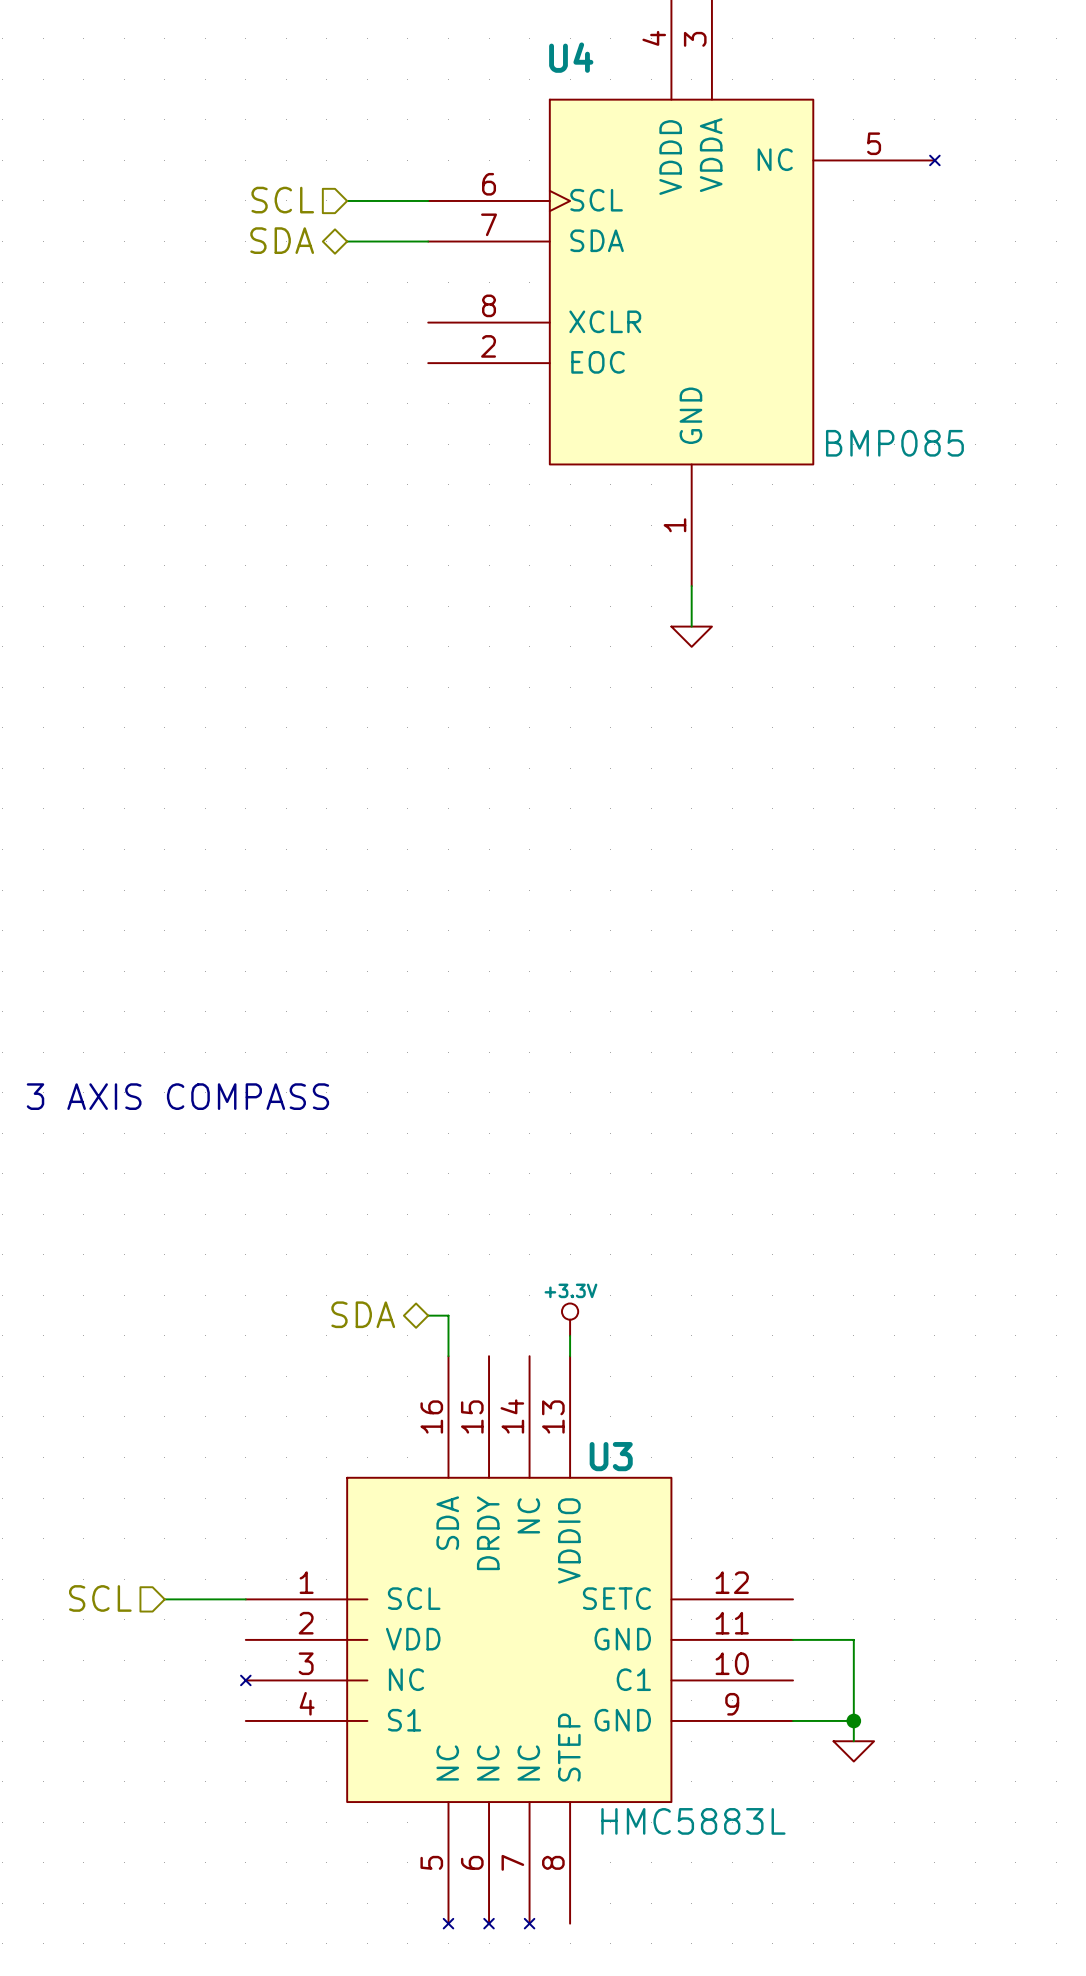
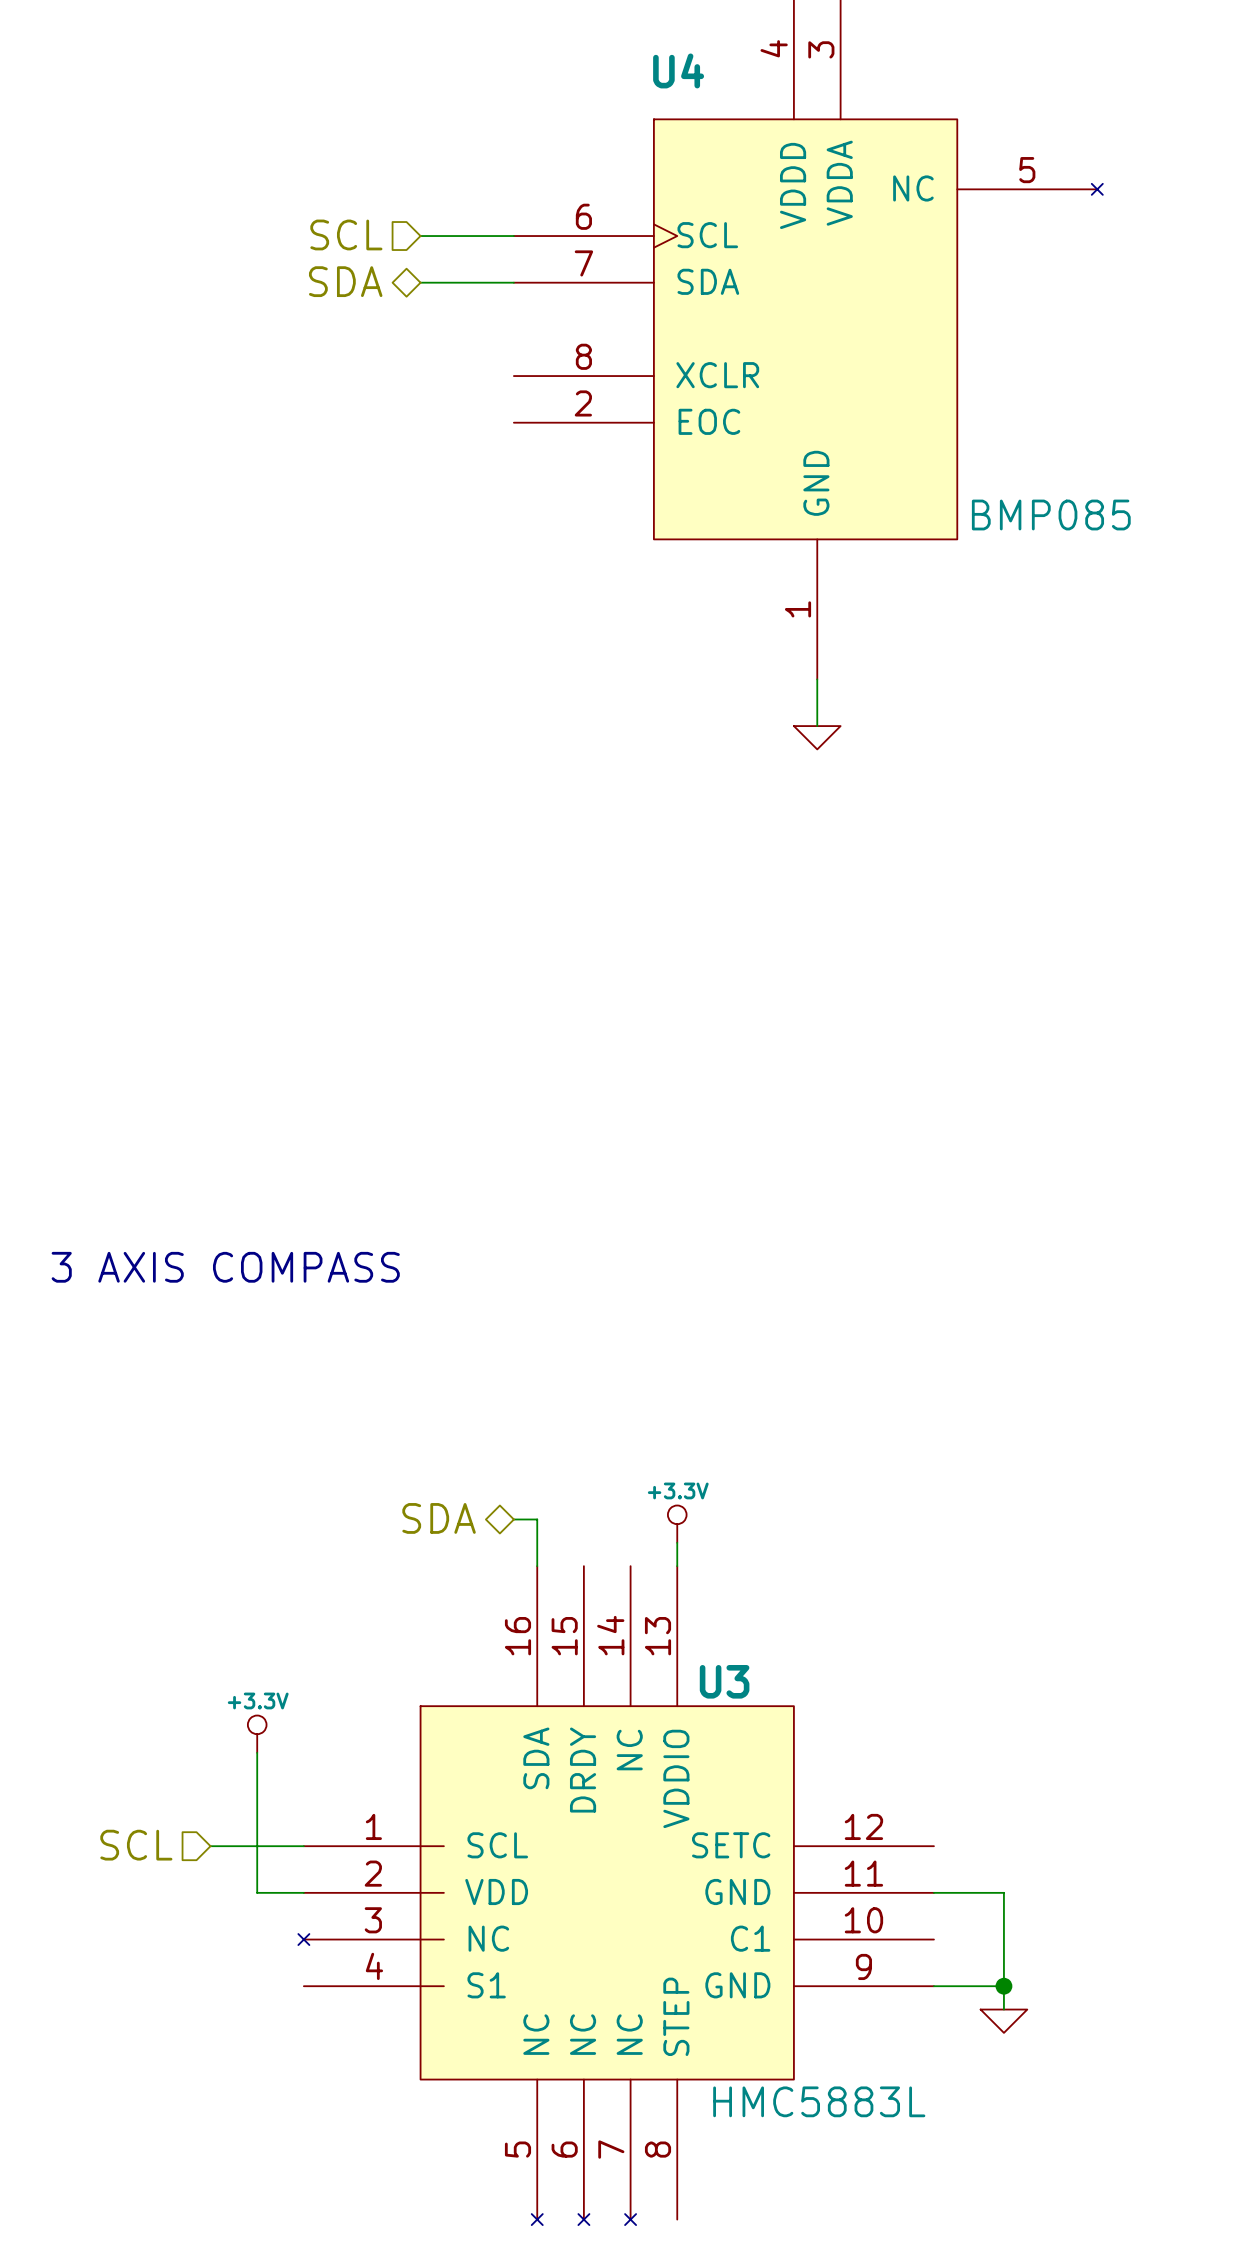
power symbol: none -> +3.3V (257, 1734)
wire: none -> (257, 1752) (257, 1892) (303, 1892)

